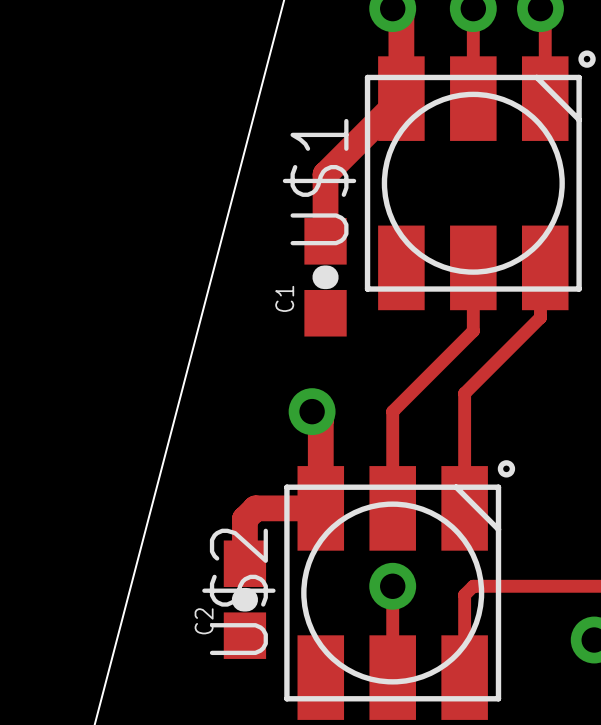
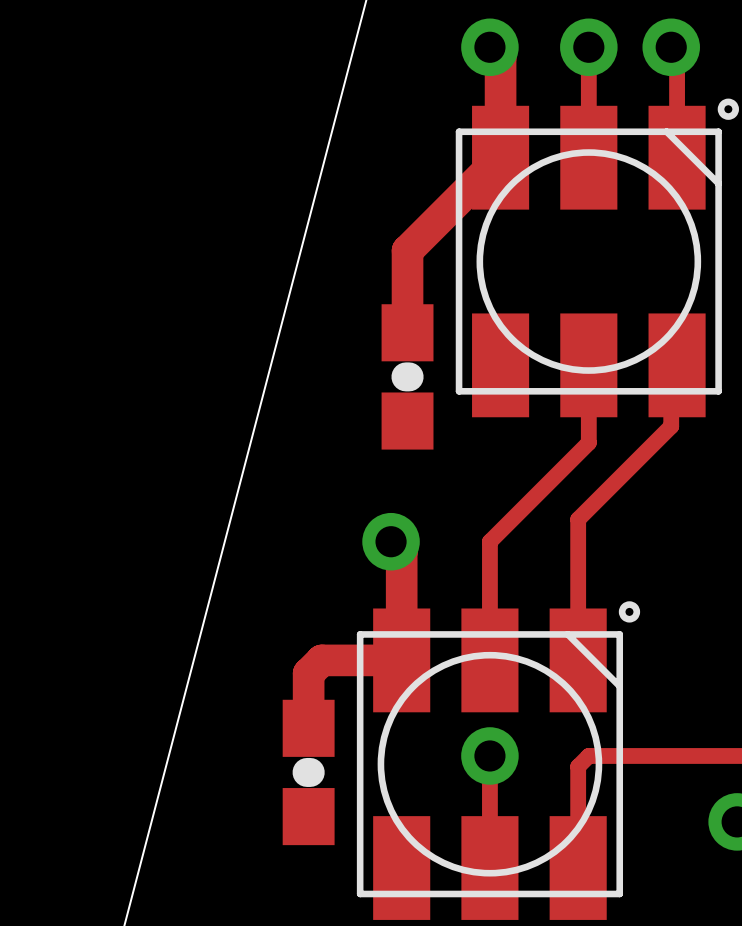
U$1 name: U$1 (319, 182) -> none
C1 name: C1 (284, 298) -> none
U$2 name: U$2 (238, 591) -> none
C2 name: C2 (204, 621) -> none

